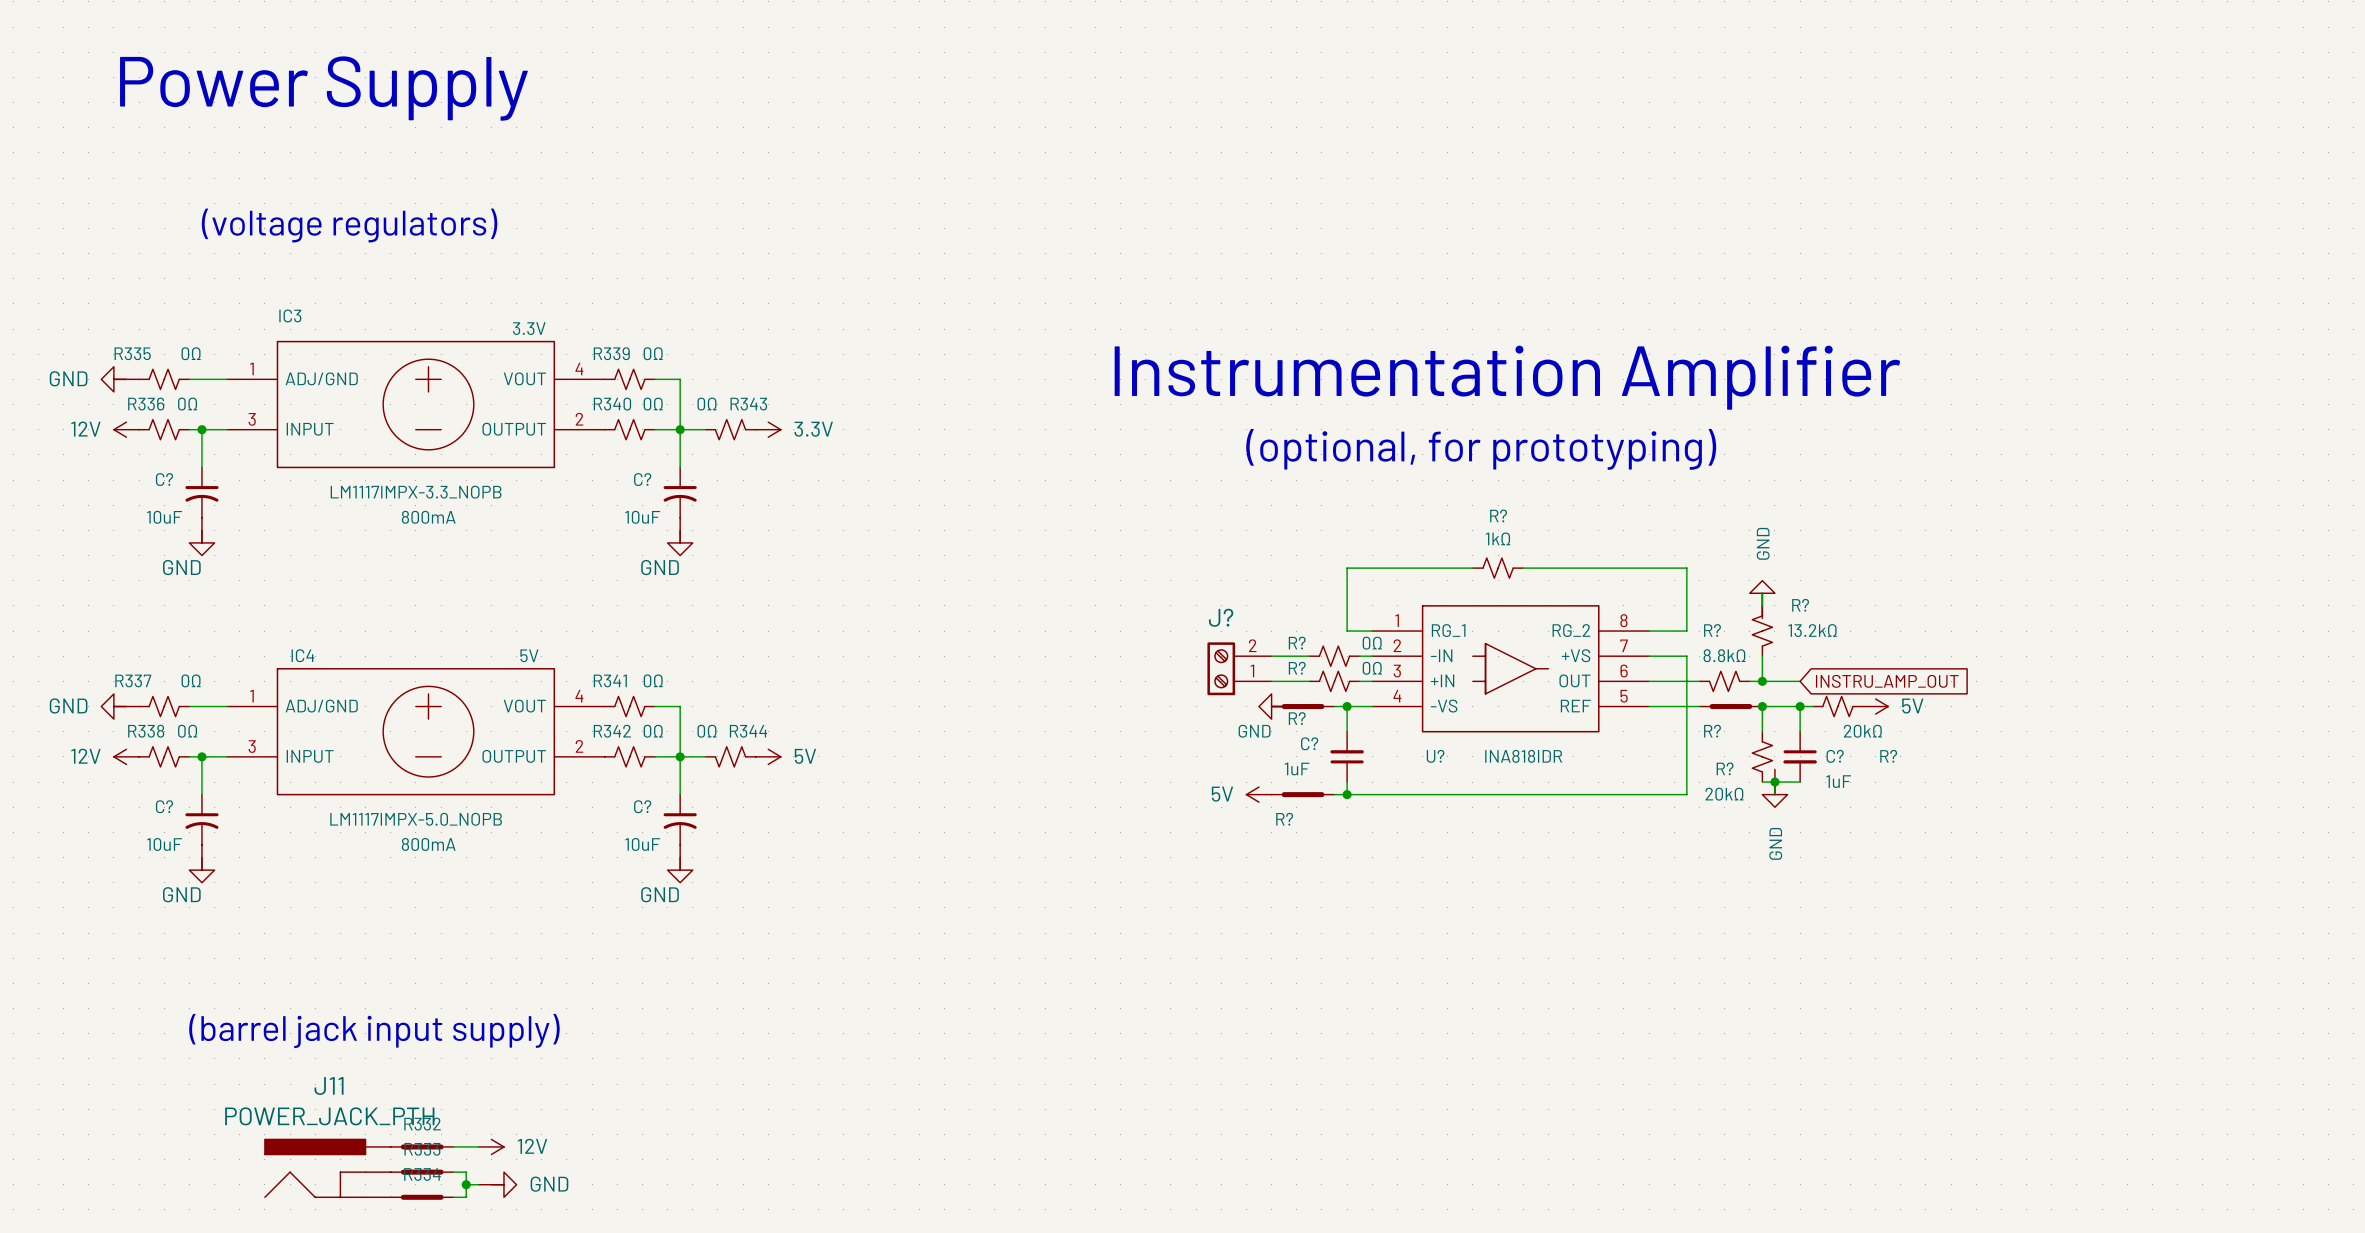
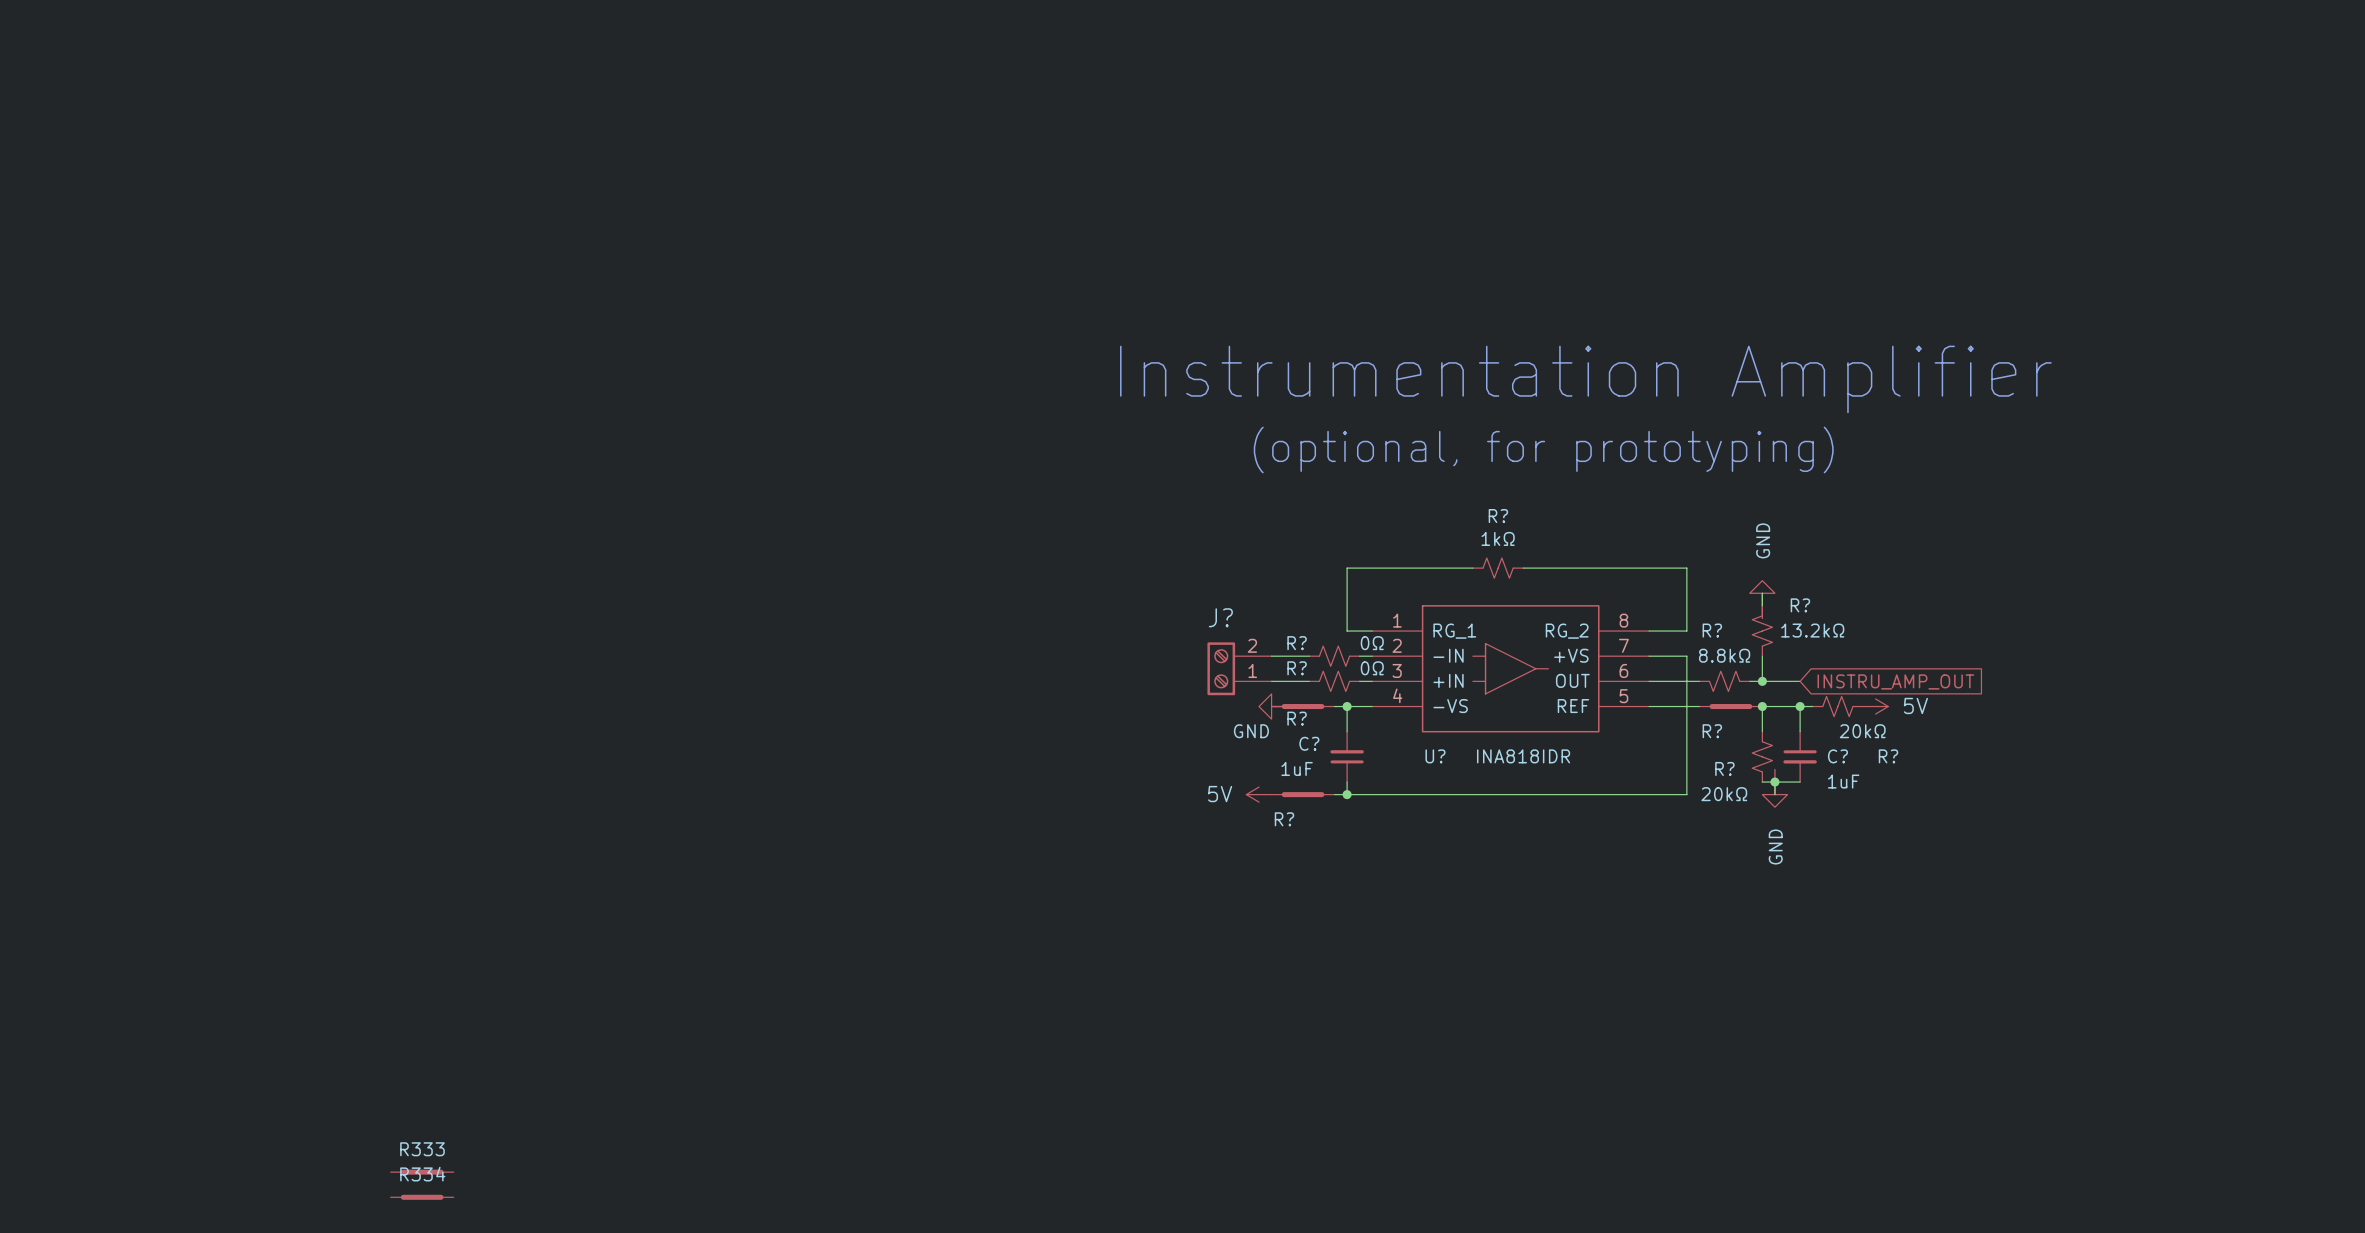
text: Power Supply (324, 88) -> none
text: (voltage regulators) (349, 225) -> none
power symbol: GND (120, 379) -> none
R335: (164, 379) -> none
wire: (189, 379) (227, 379) -> none
R339: (629, 379) -> none
wire: (654, 379) (680, 379) (680, 467) -> none
IC3: LM1117IMPX-3.3_NOPB (415, 404) -> none
power symbol: 12V (126, 429) -> none
R336: (164, 429) -> none
wire: (189, 429) (227, 429) -> none
wire: (201, 429) (201, 467) -> none
junction: (201, 429) -> none
R340: (629, 429) -> none
wire: (654, 429) (705, 429) -> none
junction: (680, 429) -> none
R343: (730, 429) -> none
power symbol: 3.3V (768, 429) -> none
C?: (201, 492) -> none
C?: (680, 492) -> none
power symbol: GND (201, 536) -> none
power symbol: GND (680, 536) -> none
power symbol: GND (120, 706) -> none
R337: (164, 706) -> none
wire: (189, 706) (227, 706) -> none
R341: (629, 706) -> none
wire: (654, 706) (680, 706) (680, 794) -> none
IC4: LM1117IMPX-5.0_NOPB (415, 731) -> none
power symbol: 12V (126, 756) -> none
R338: (164, 756) -> none
wire: (189, 756) (227, 756) -> none
wire: (201, 756) (201, 794) -> none
junction: (201, 756) -> none
R342: (629, 756) -> none
wire: (654, 756) (705, 756) -> none
junction: (680, 756) -> none
R344: (730, 756) -> none
power symbol: 5V (768, 756) -> none
C?: (201, 819) -> none
C?: (680, 819) -> none
power symbol: GND (201, 863) -> none
power symbol: GND (680, 863) -> none
text: (barrel jack input supply) (374, 1031) -> none
R332: (422, 1146) -> none
wire: (453, 1146) (478, 1146) -> none
power symbol: 12V (491, 1146) -> none
J11: POWER_JACK_PTH (327, 1168) -> none
wire: (453, 1172) (466, 1172) (466, 1197) (453, 1197) -> none
wire: (466, 1184) (478, 1184) -> none
junction: (466, 1184) -> none
power symbol: GND (497, 1184) -> none

